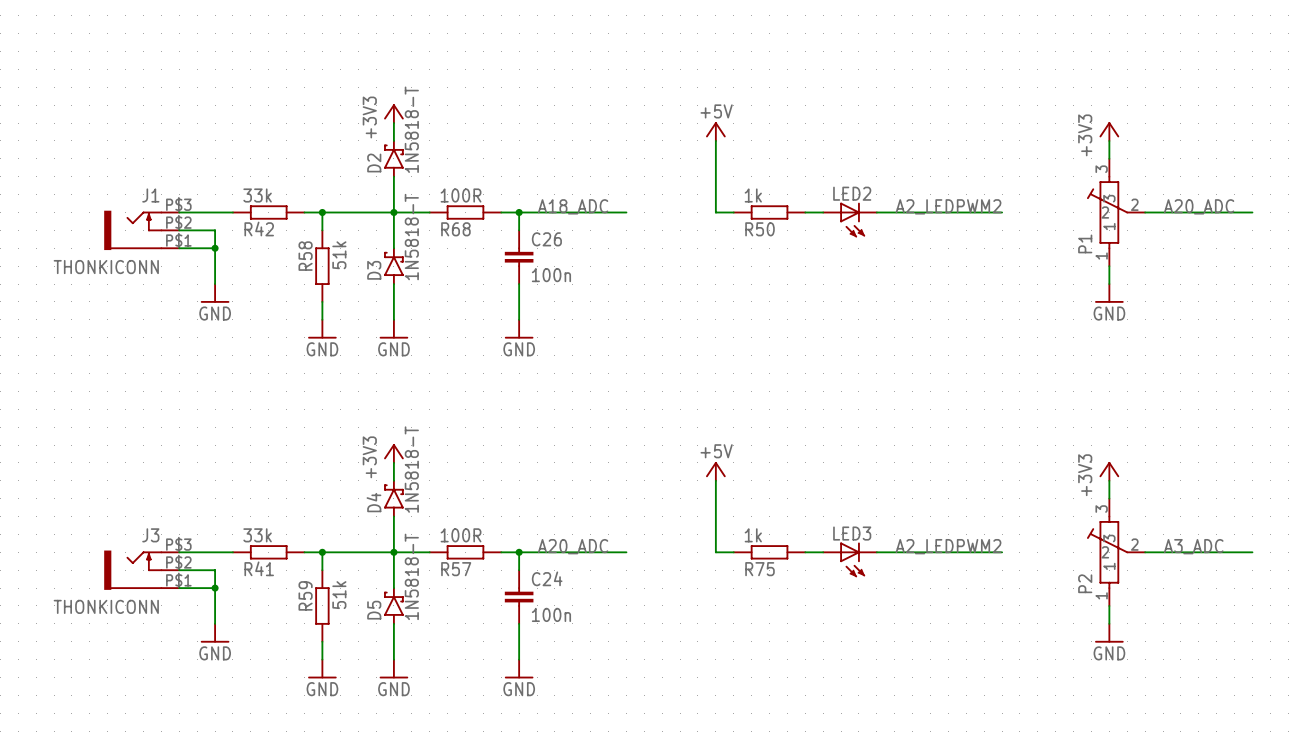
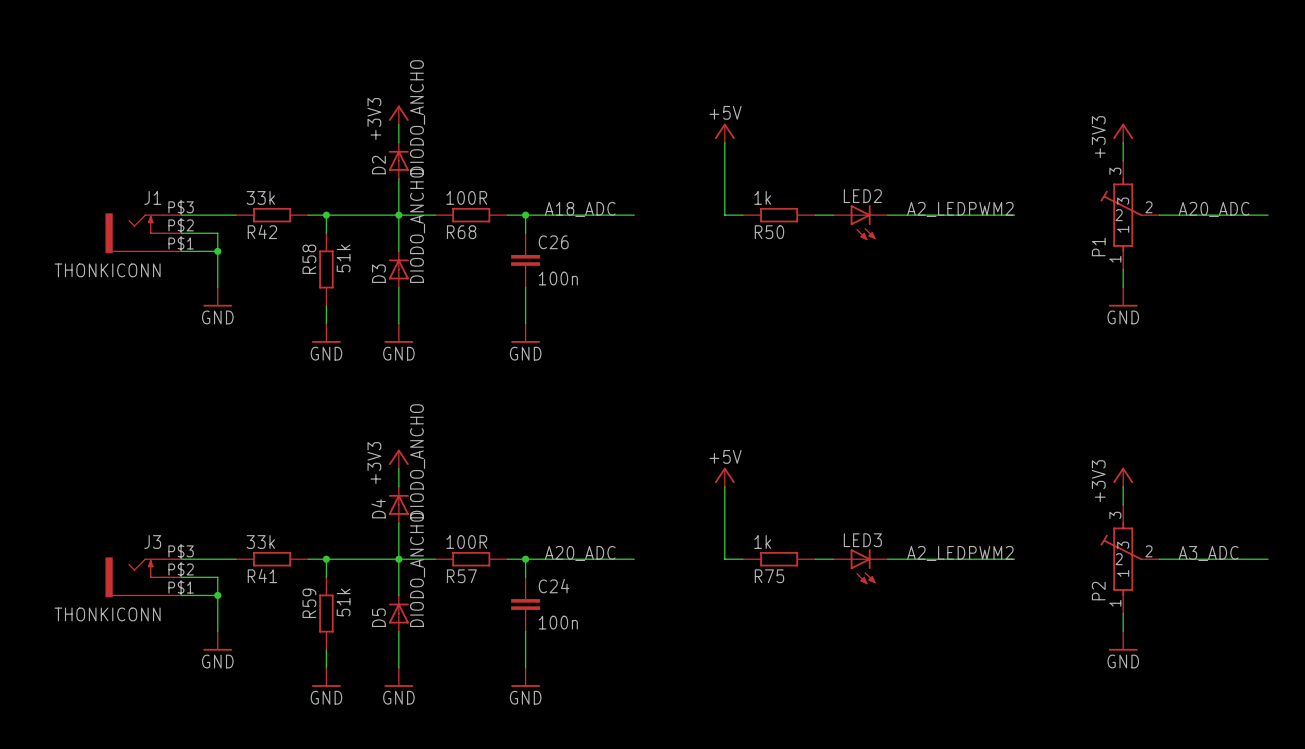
D2 value: 1N5818-T (411, 129) -> DIODO_ANCHO (417, 117)
D2 symbol: [384, 140, 404, 178] -> [388, 142, 409, 179]
D3 value: 1N5818-T (411, 237) -> DIODO_ANCHO (417, 225)
D3 symbol: [384, 247, 404, 285] -> [388, 251, 409, 288]
D4 value: 1N5818-T (411, 469) -> DIODO_ANCHO (417, 461)
D4 symbol: [384, 479, 404, 518] -> [388, 486, 409, 523]
D5 value: 1N5818-T (411, 576) -> DIODO_ANCHO (417, 569)
D5 symbol: [384, 587, 404, 625] -> [388, 595, 409, 632]

